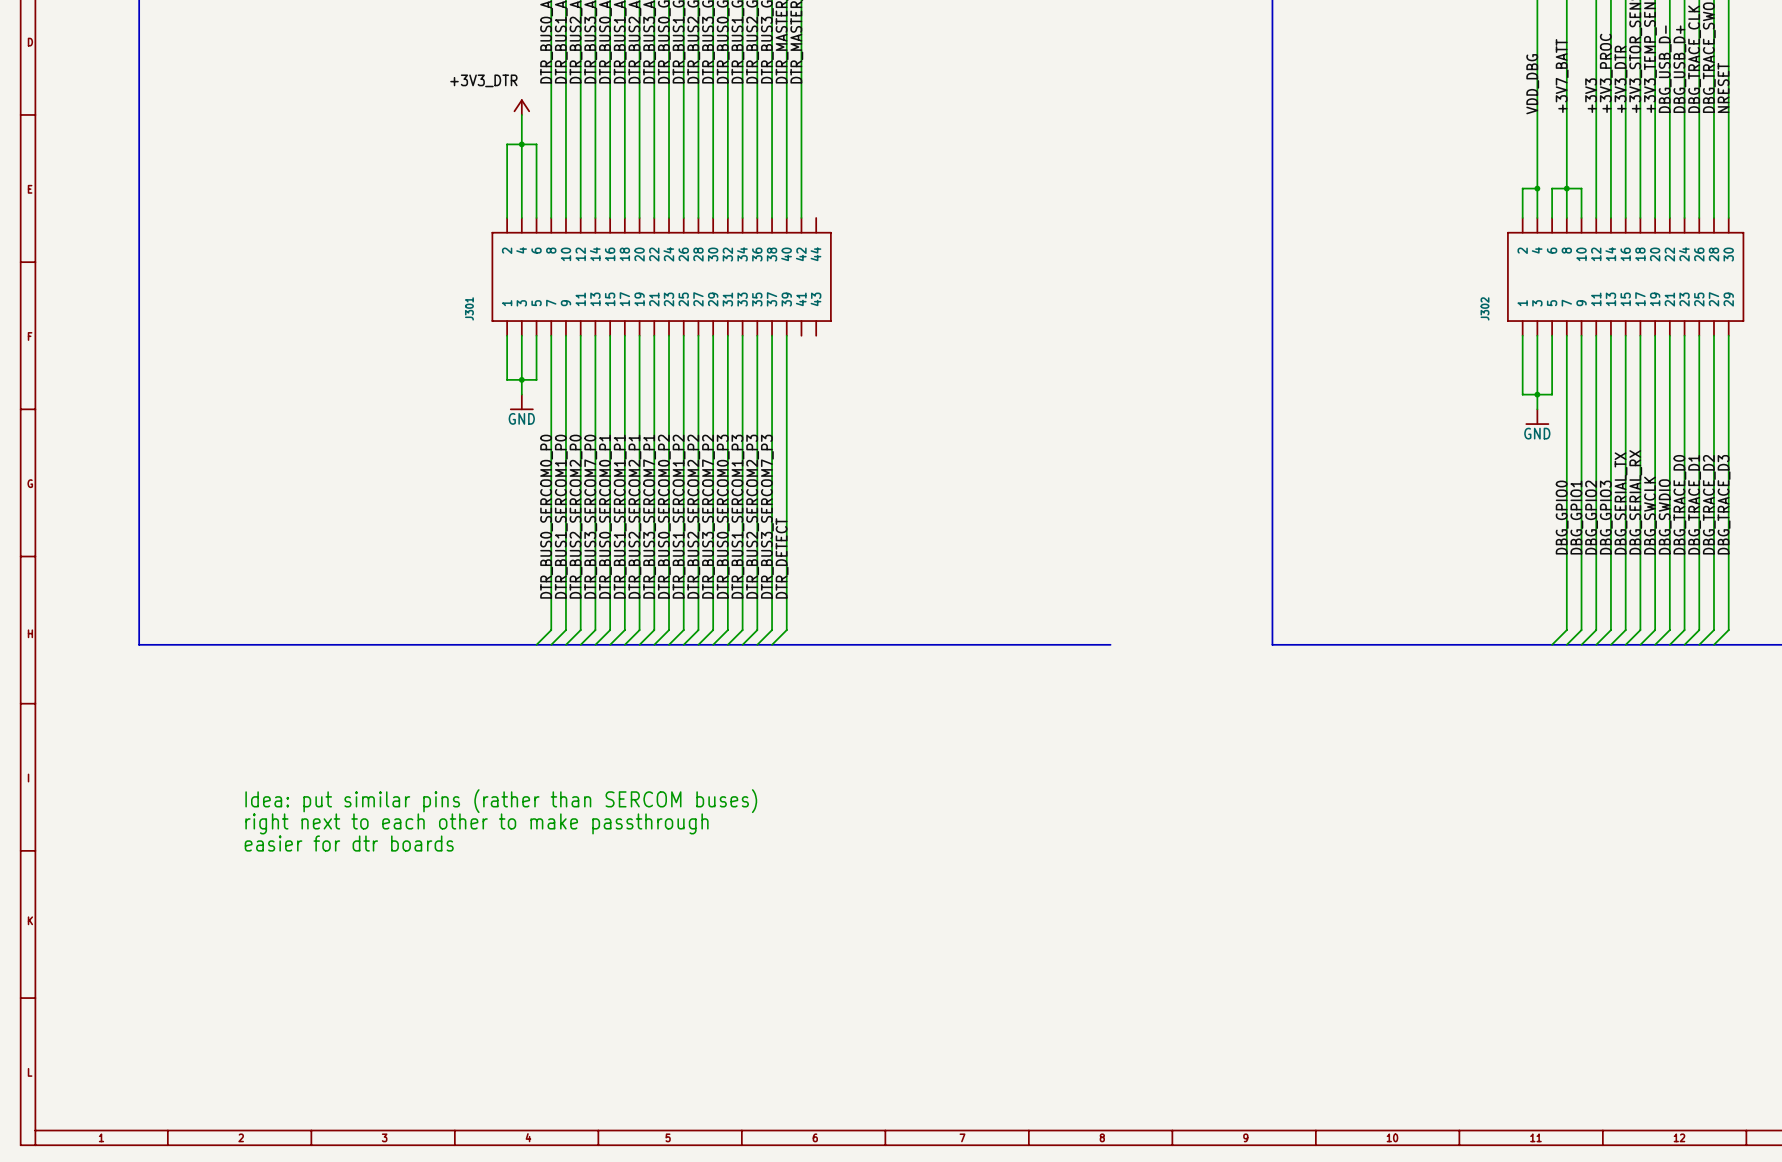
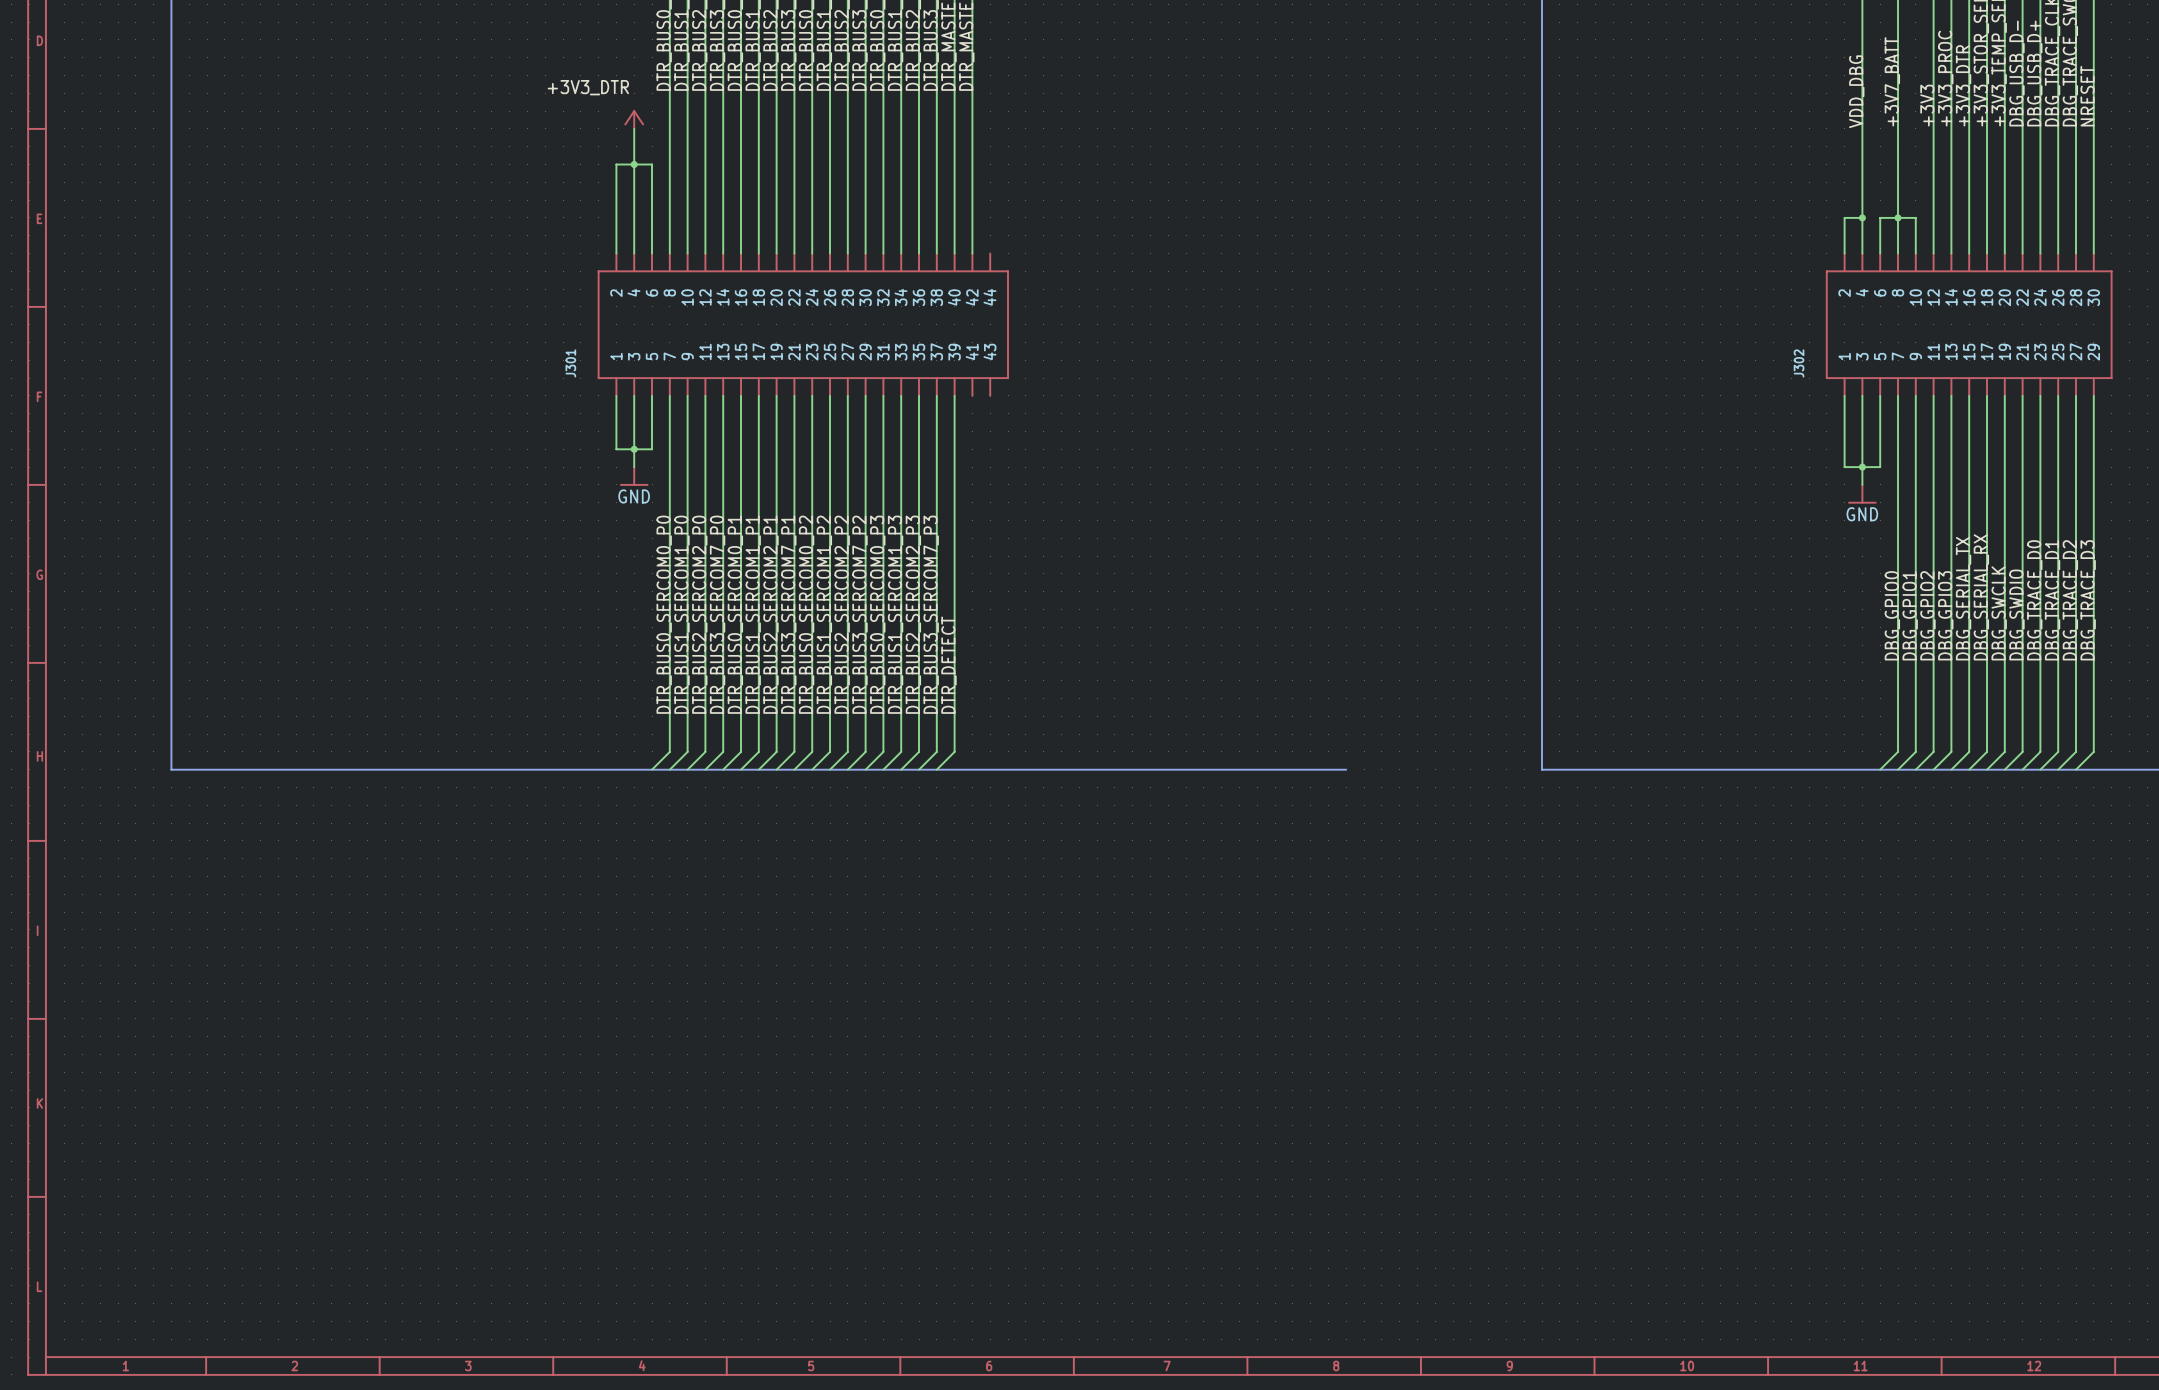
text: Idea: put similar pins (rather than SERCOM buses) (501, 801) -> none
text: right next to each other to make passthrough (476, 823) -> none
text: easier for dtr boards (349, 843) -> none

